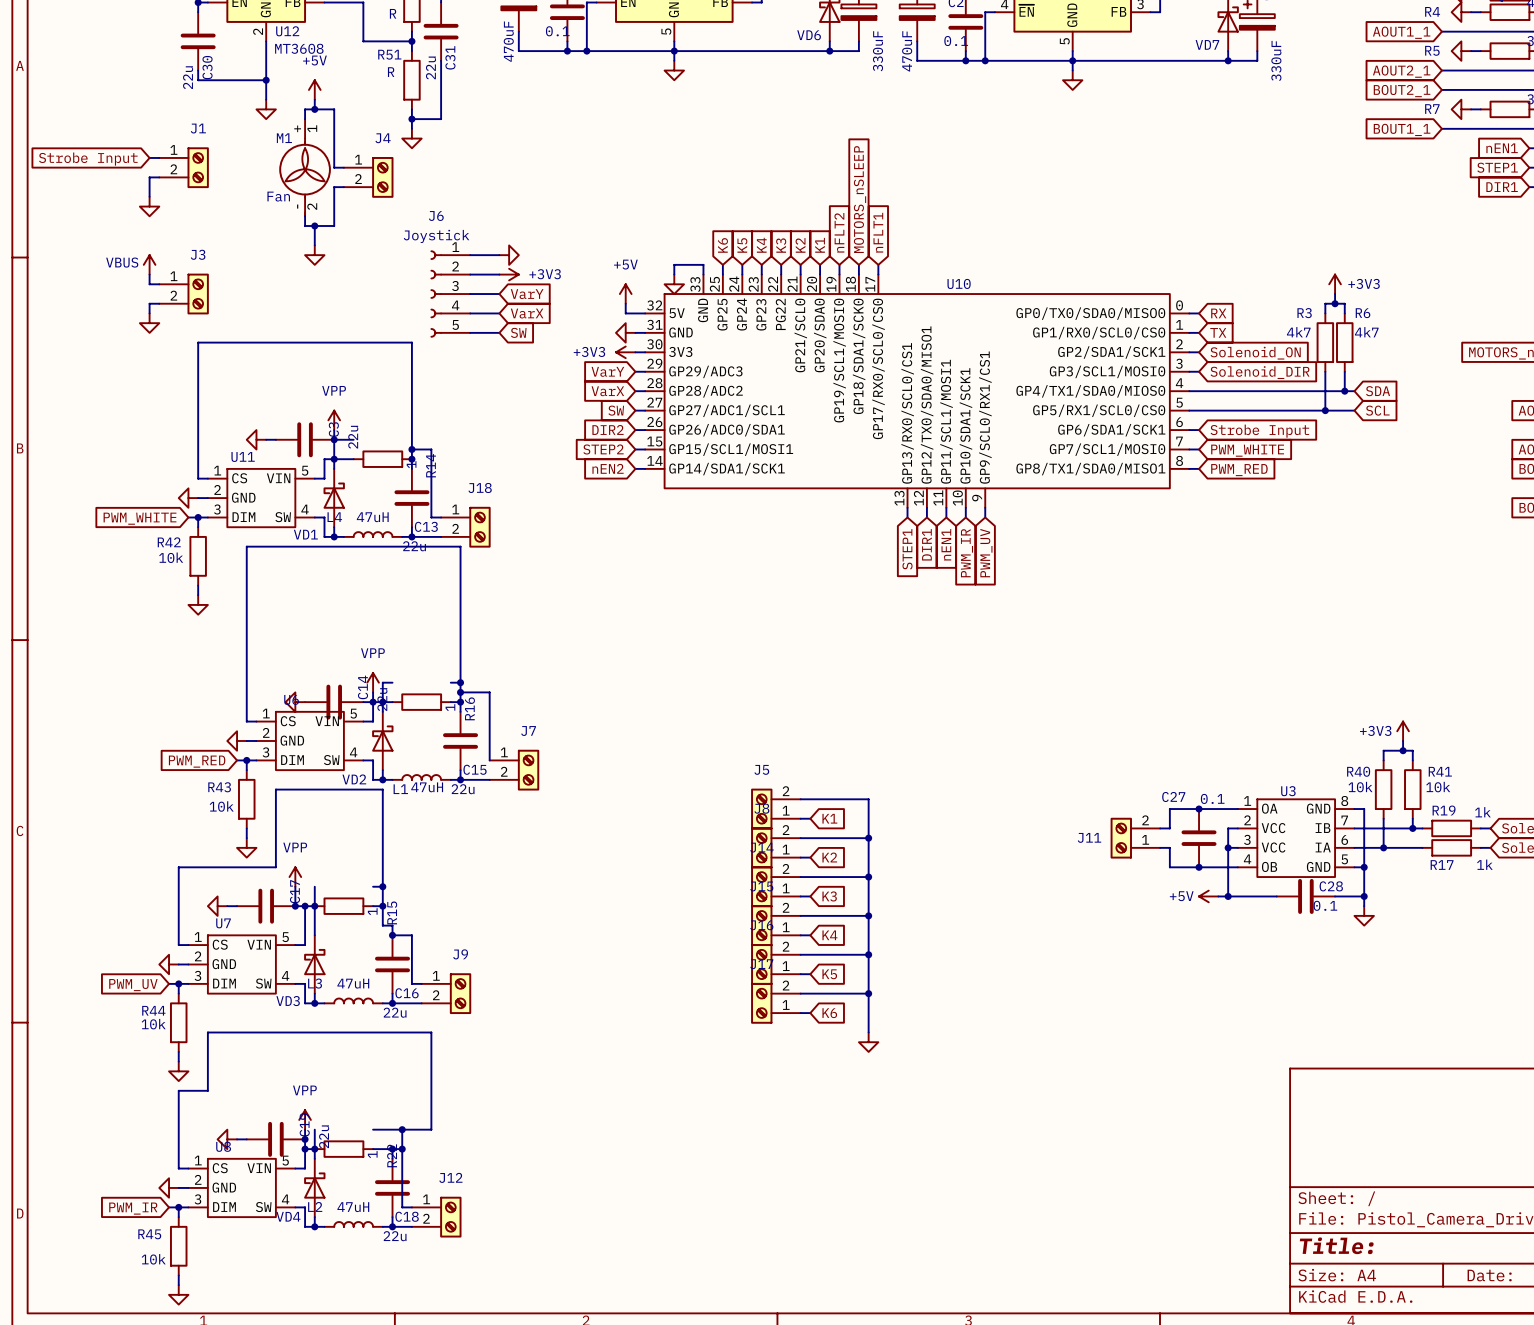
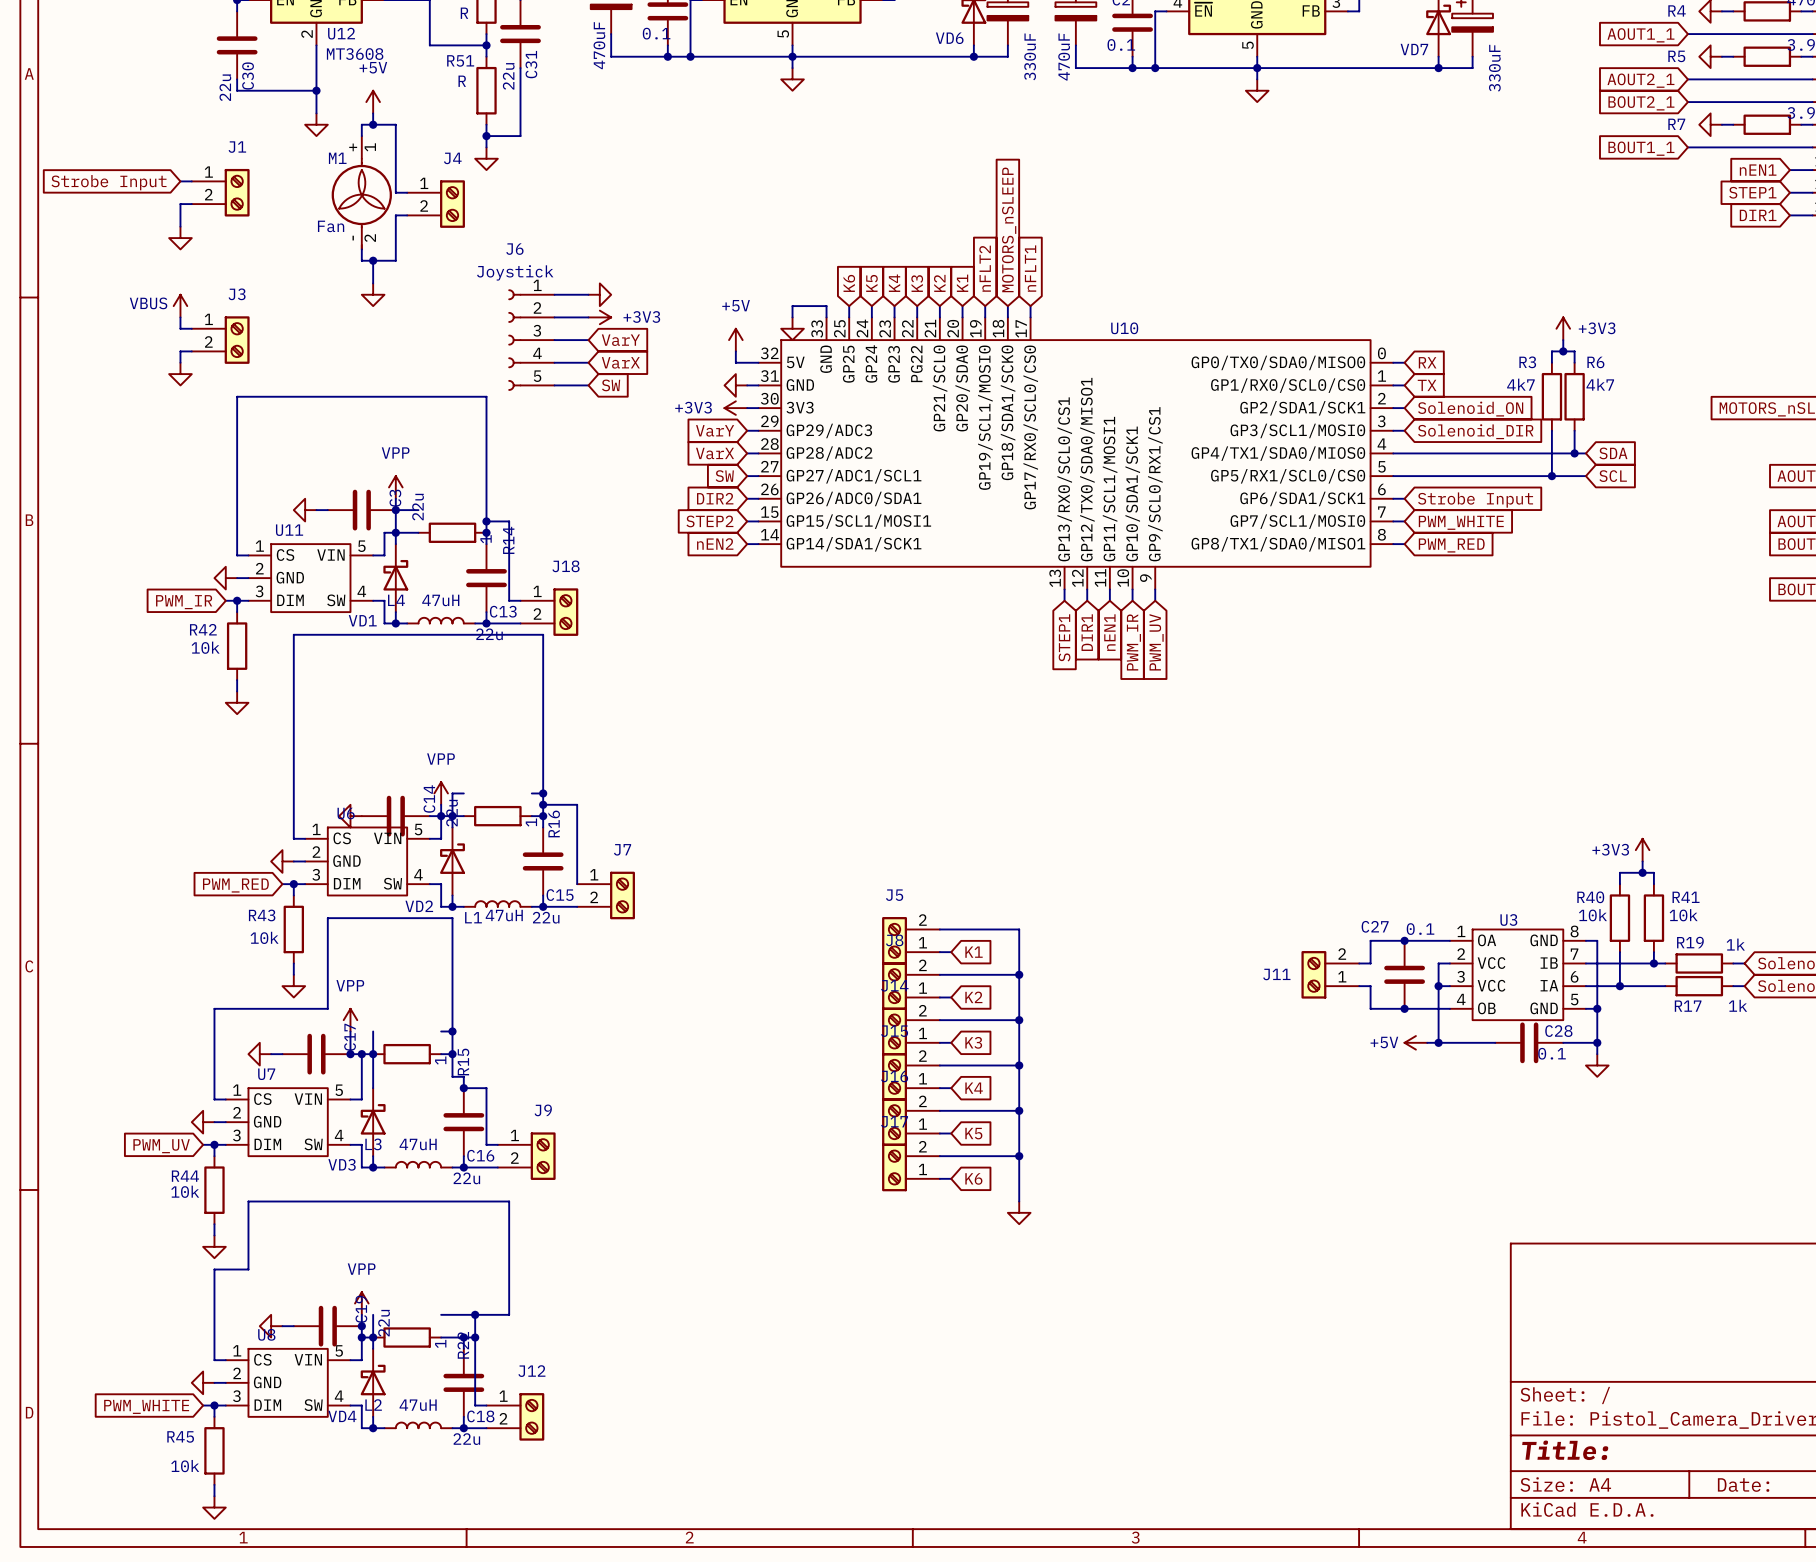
global label: PWM_WHITE (140, 518) -> PWM_IR (184, 602)
global label: PWM_IR (133, 1208) -> PWM_WHITE (146, 1406)

